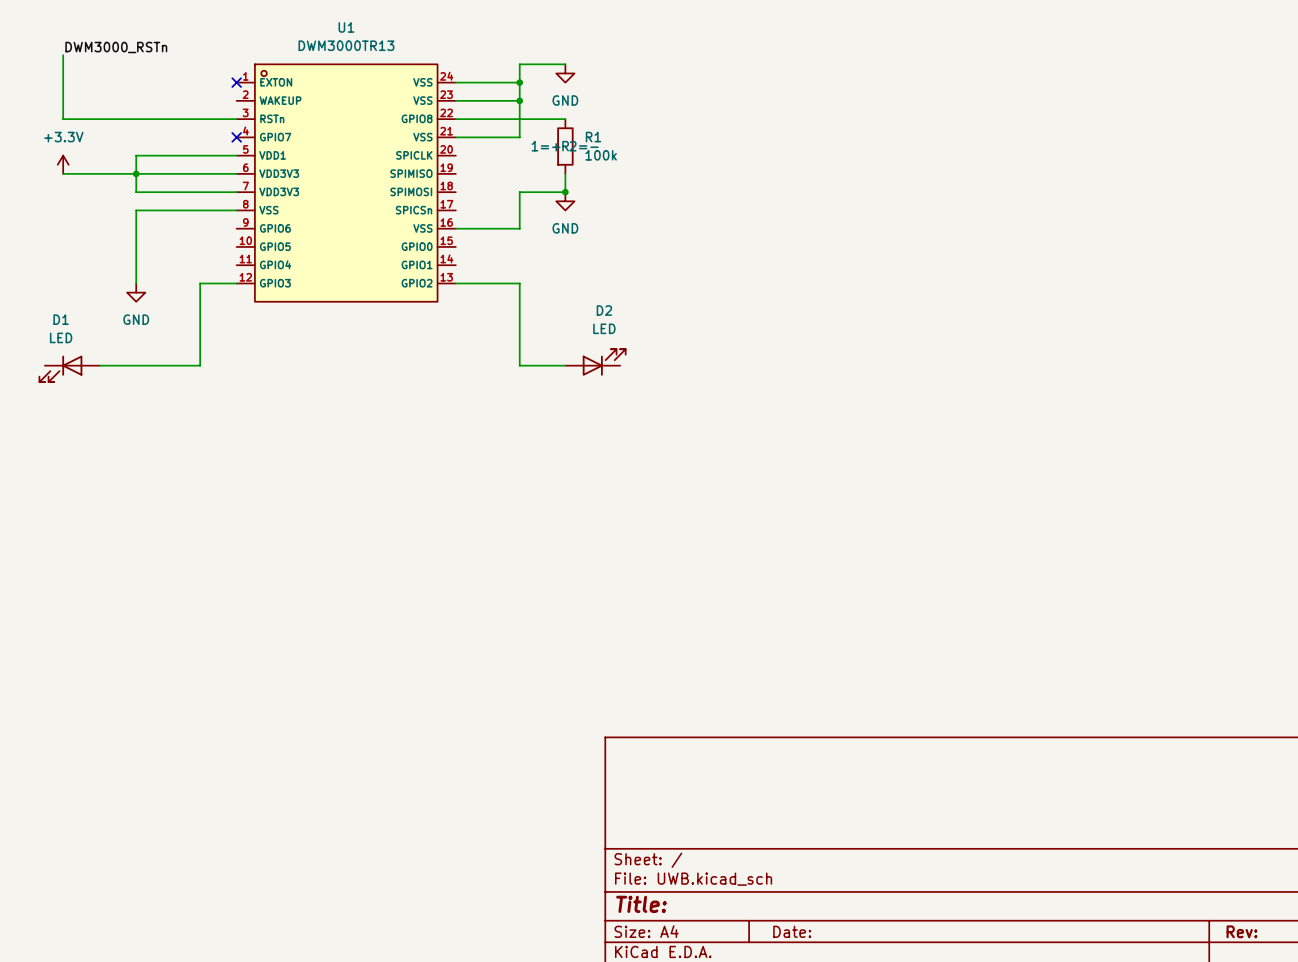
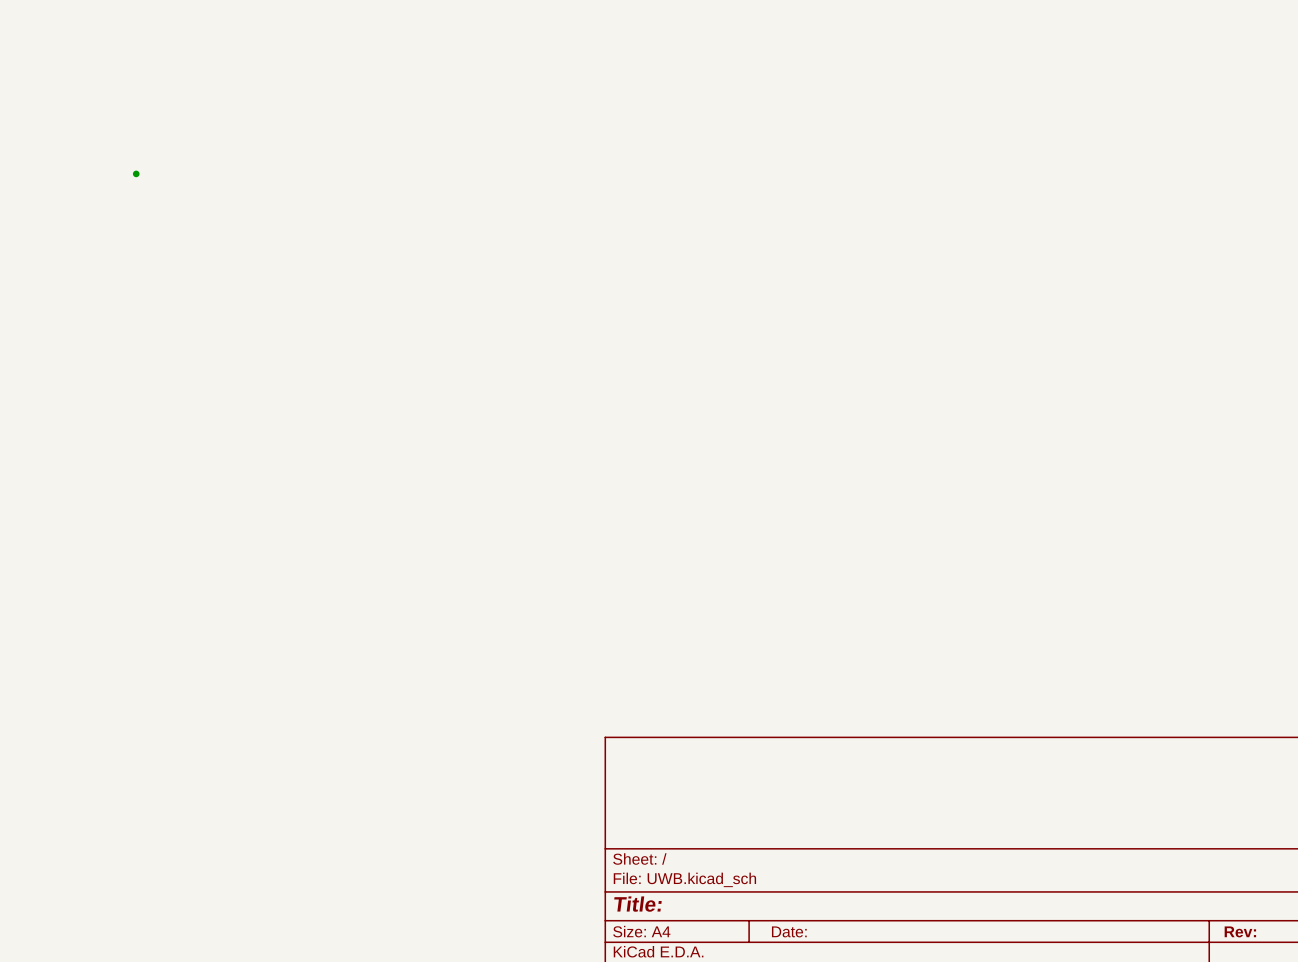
label: DWM3000_RSTn (116, 47) -> none
wire: (63, 55) (63, 119) (236, 119) -> none
wire: (565, 64) (519, 64) (519, 137) (455, 137) -> none
power symbol: GND (565, 73) -> none
no-connect mark: (236, 82) -> none
wire: (455, 82) (519, 82) -> none
junction: (519, 82) -> none
wire: (455, 100) (519, 100) -> none
junction: (519, 100) -> none
wire: (455, 119) (565, 119) -> none
no-connect mark: (236, 137) -> none
R1: 100k (565, 146) -> none
wire: (236, 155) (136, 155) (136, 192) (236, 192) -> none
power symbol: +3.3V (63, 164) -> none
wire: (63, 173) (236, 173) -> none
wire: (565, 173) (565, 192) (519, 192) (519, 228) (455, 228) -> none
U1: DWM3000TR13 (346, 183) -> none
junction: (565, 192) -> none
power symbol: GND (565, 201) -> none
wire: (236, 210) (136, 210) (136, 283) -> none
wire: (236, 283) (200, 283) (200, 365) (99, 365) -> none
wire: (455, 283) (519, 283) (519, 365) (565, 365) -> none
power symbol: GND (136, 292) -> none
D2: LED (595, 362) -> none
D1: LED (69, 368) -> none

